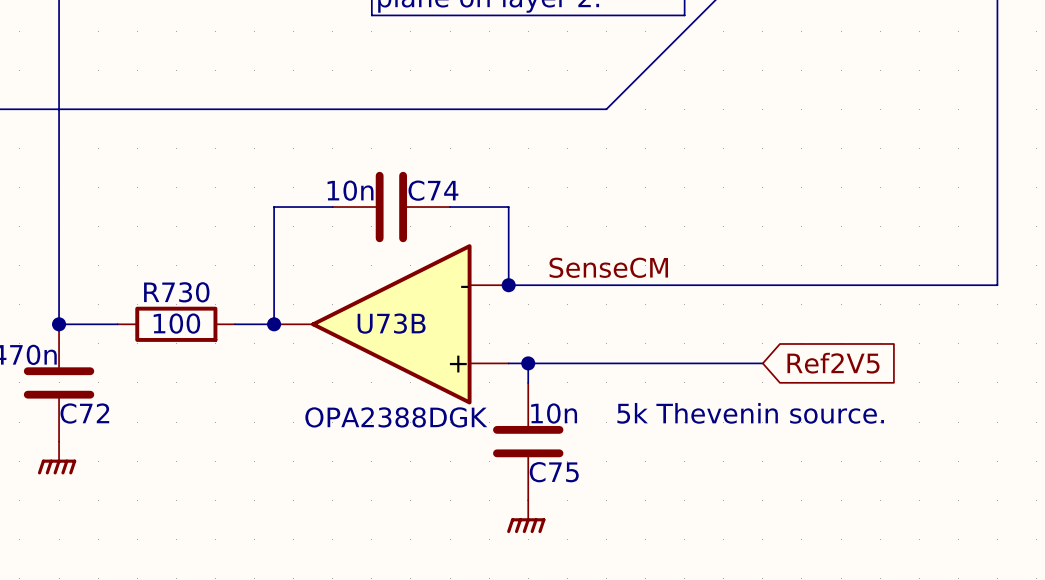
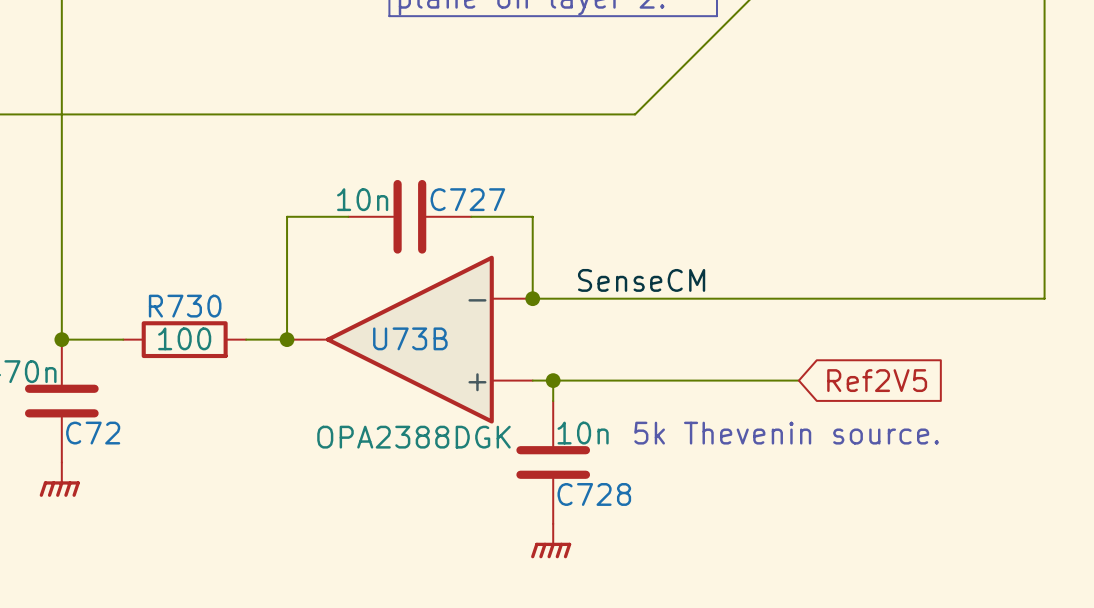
C74 name: C74 (433, 190) -> C727 (467, 199)
C75 name: C75 (554, 472) -> C728 (594, 494)

